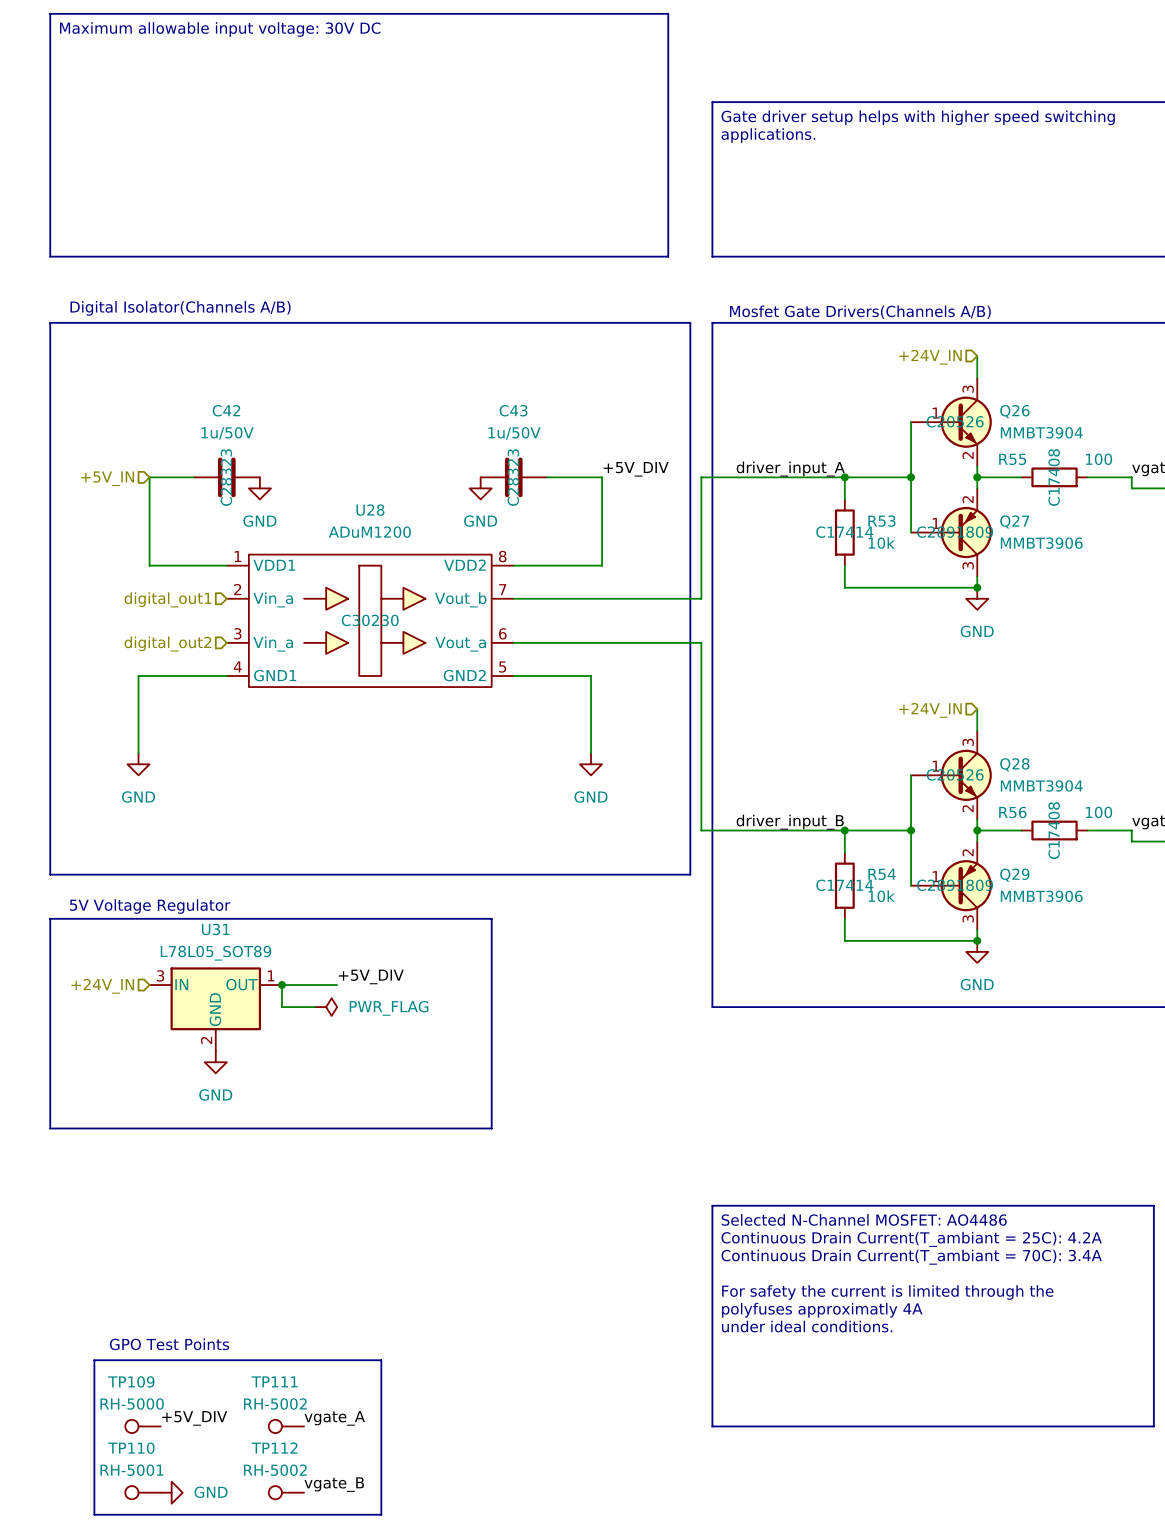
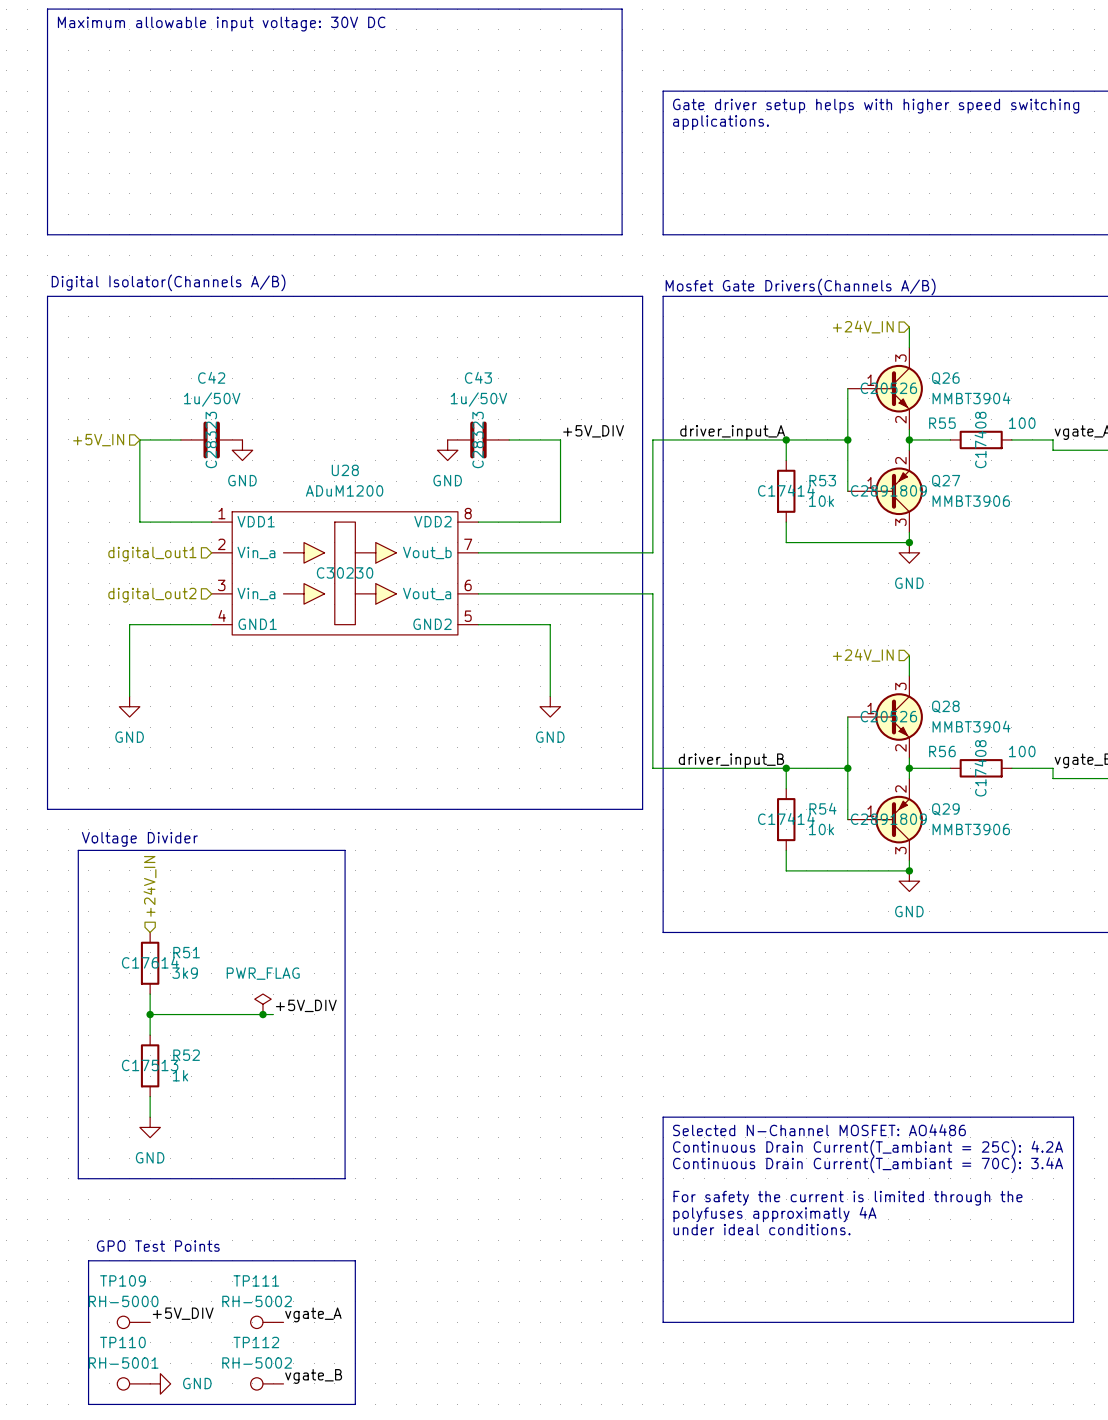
text: 5V Voltage Regulator (150, 906) -> Voltage Divider (139, 839)
line: (83, 918) (50, 918) (50, 1128) (491, 1128) (491, 918) (370, 918) -> (78, 850) (78, 1178) (345, 1178) (345, 850)
label position: +5V_DIV (371, 976) -> +5V_DIV (306, 1005)
junction: (282, 985) -> none
wire: (337, 985) (282, 985) (282, 1007) (315, 1007) -> none
hierarchical label rotation: 0° (102, 986) -> 90° clockwise (149, 886)
power symbol rotation: 0° (326, 1007) -> 90° counterclockwise (262, 1004)
power symbol position: PWR_FLAG (326, 1007) -> PWR_FLAG (262, 1004)
power symbol text position: PWR_FLAG (389, 1008) -> PWR_FLAG (263, 973)
U31: L78L05_SOT89 (215, 1009) -> none
R51: none -> 3k9 (150, 963)
power symbol position: GND (215, 1062) -> GND (150, 1127)
wire: none -> (150, 994) (150, 1035)
wire: none -> (150, 1014) (273, 1014)
junction: none -> (150, 1014)
junction: none -> (262, 1014)
R52: none -> 1k (150, 1065)
wire: none -> (150, 1096) (150, 1117)

